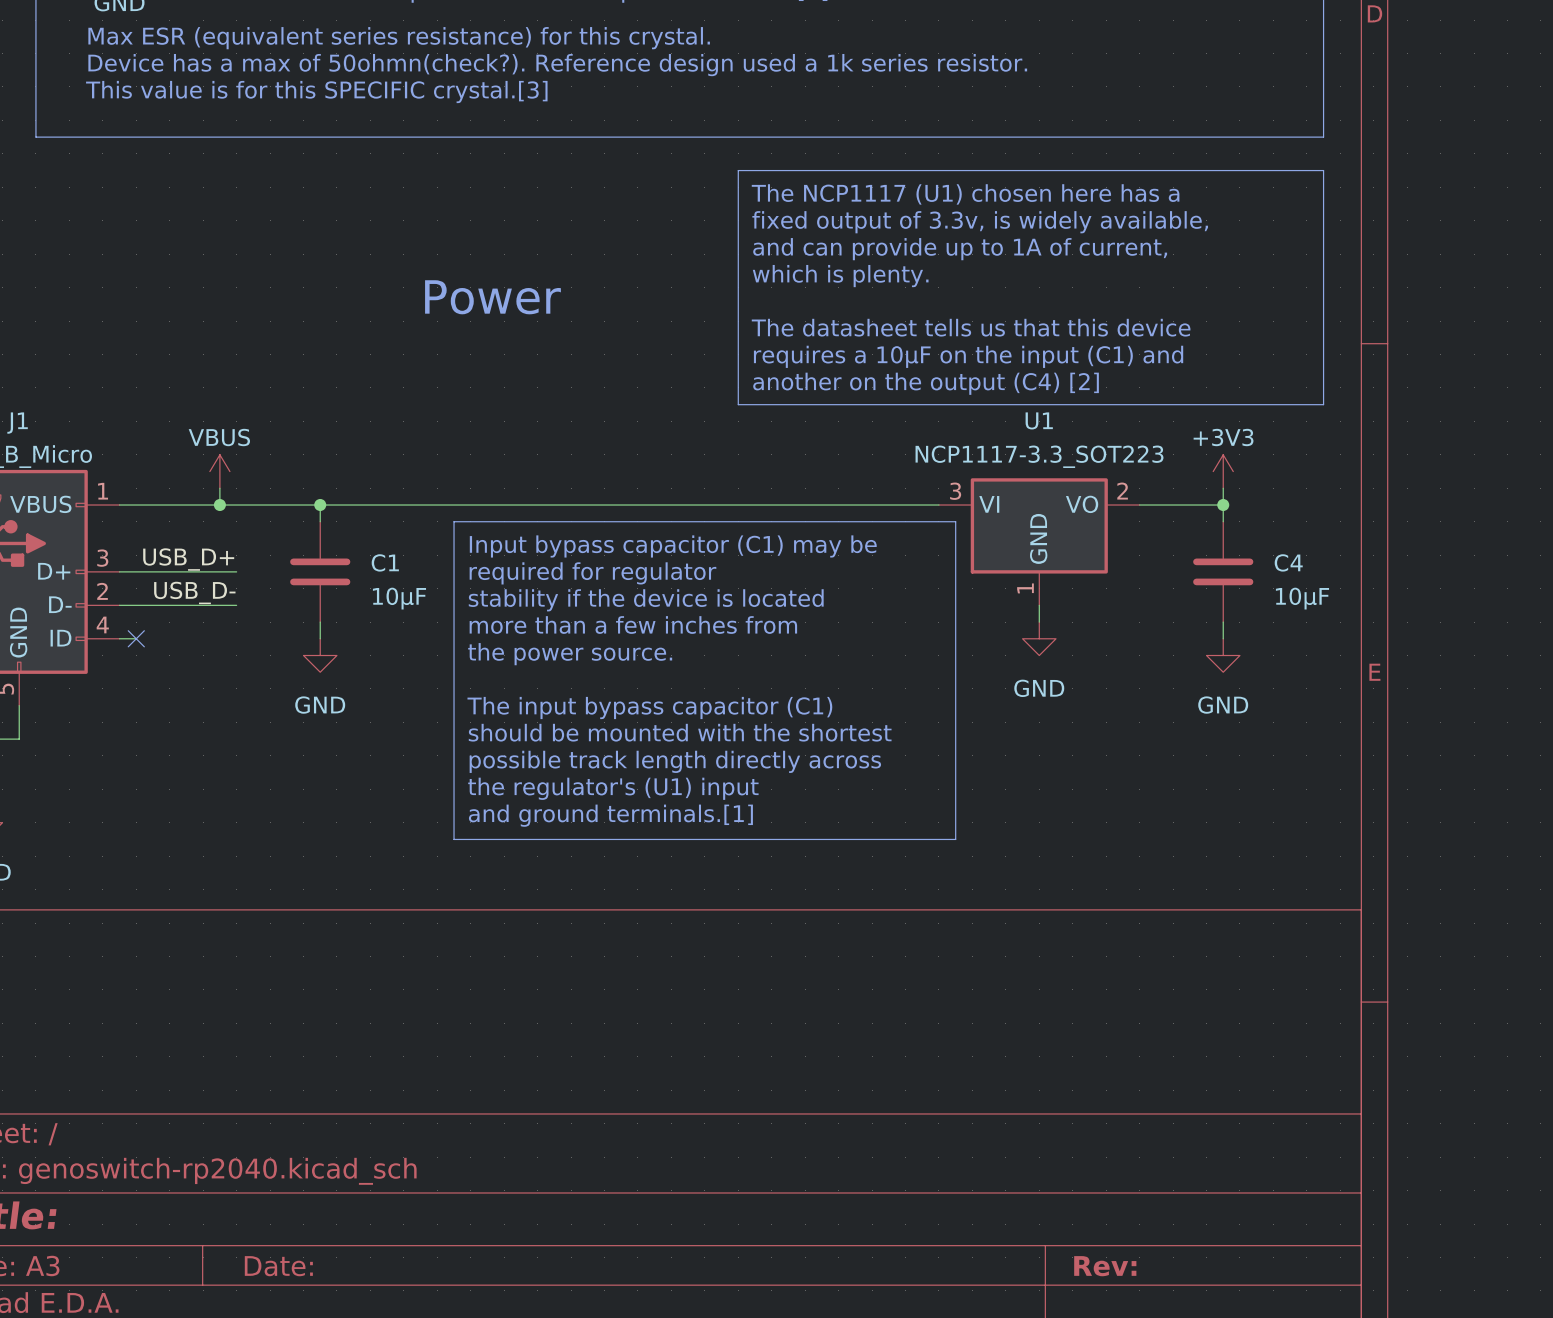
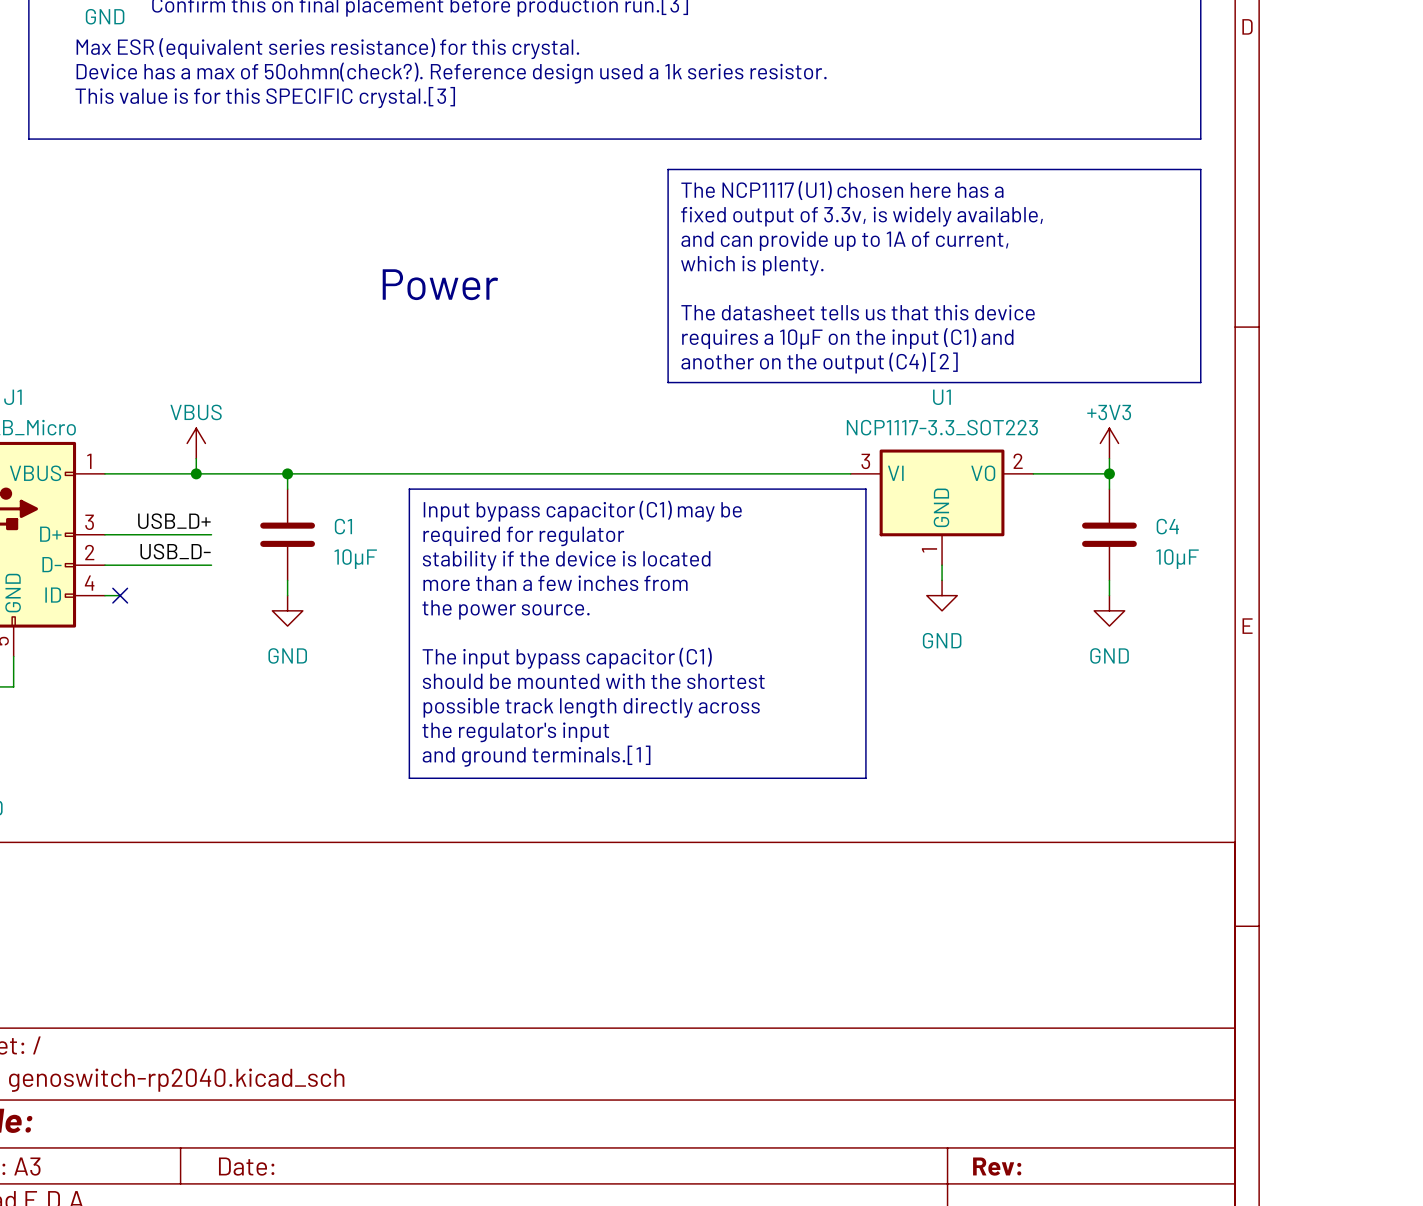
text: the regulator's (U1) input (613, 788) -> the regulator's input (515, 732)

